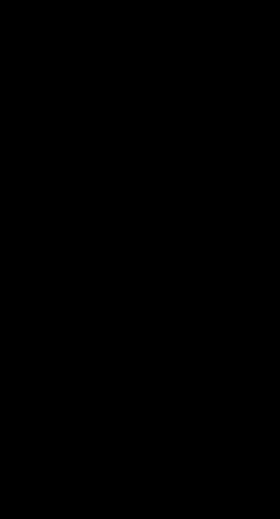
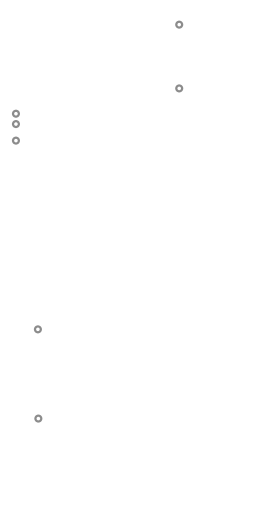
via: none -> (179, 24)
via: none -> (179, 88)
via: none -> (15, 113)
via: none -> (15, 124)
via: none -> (15, 140)
via: none -> (37, 329)
via: none -> (38, 418)

